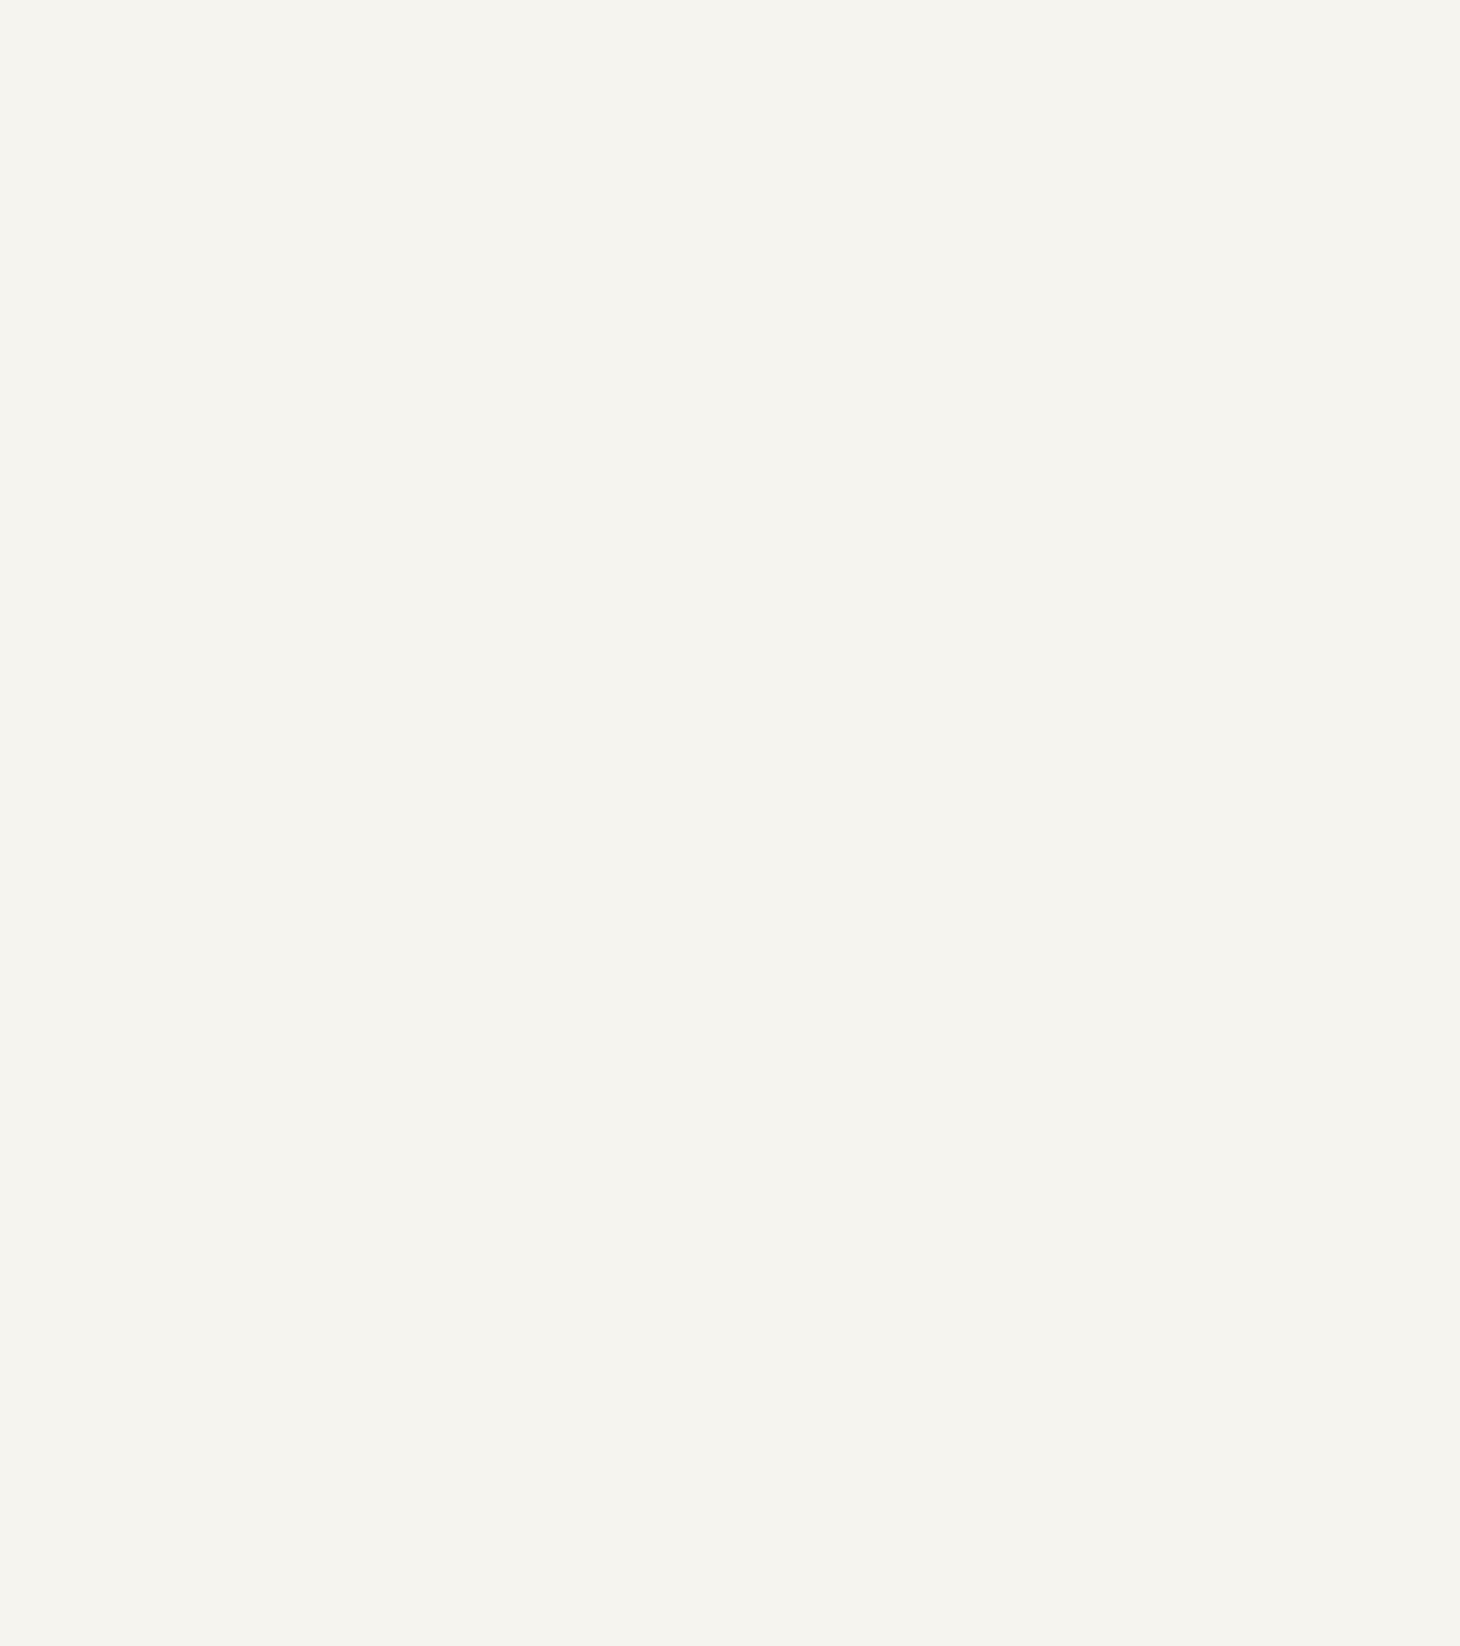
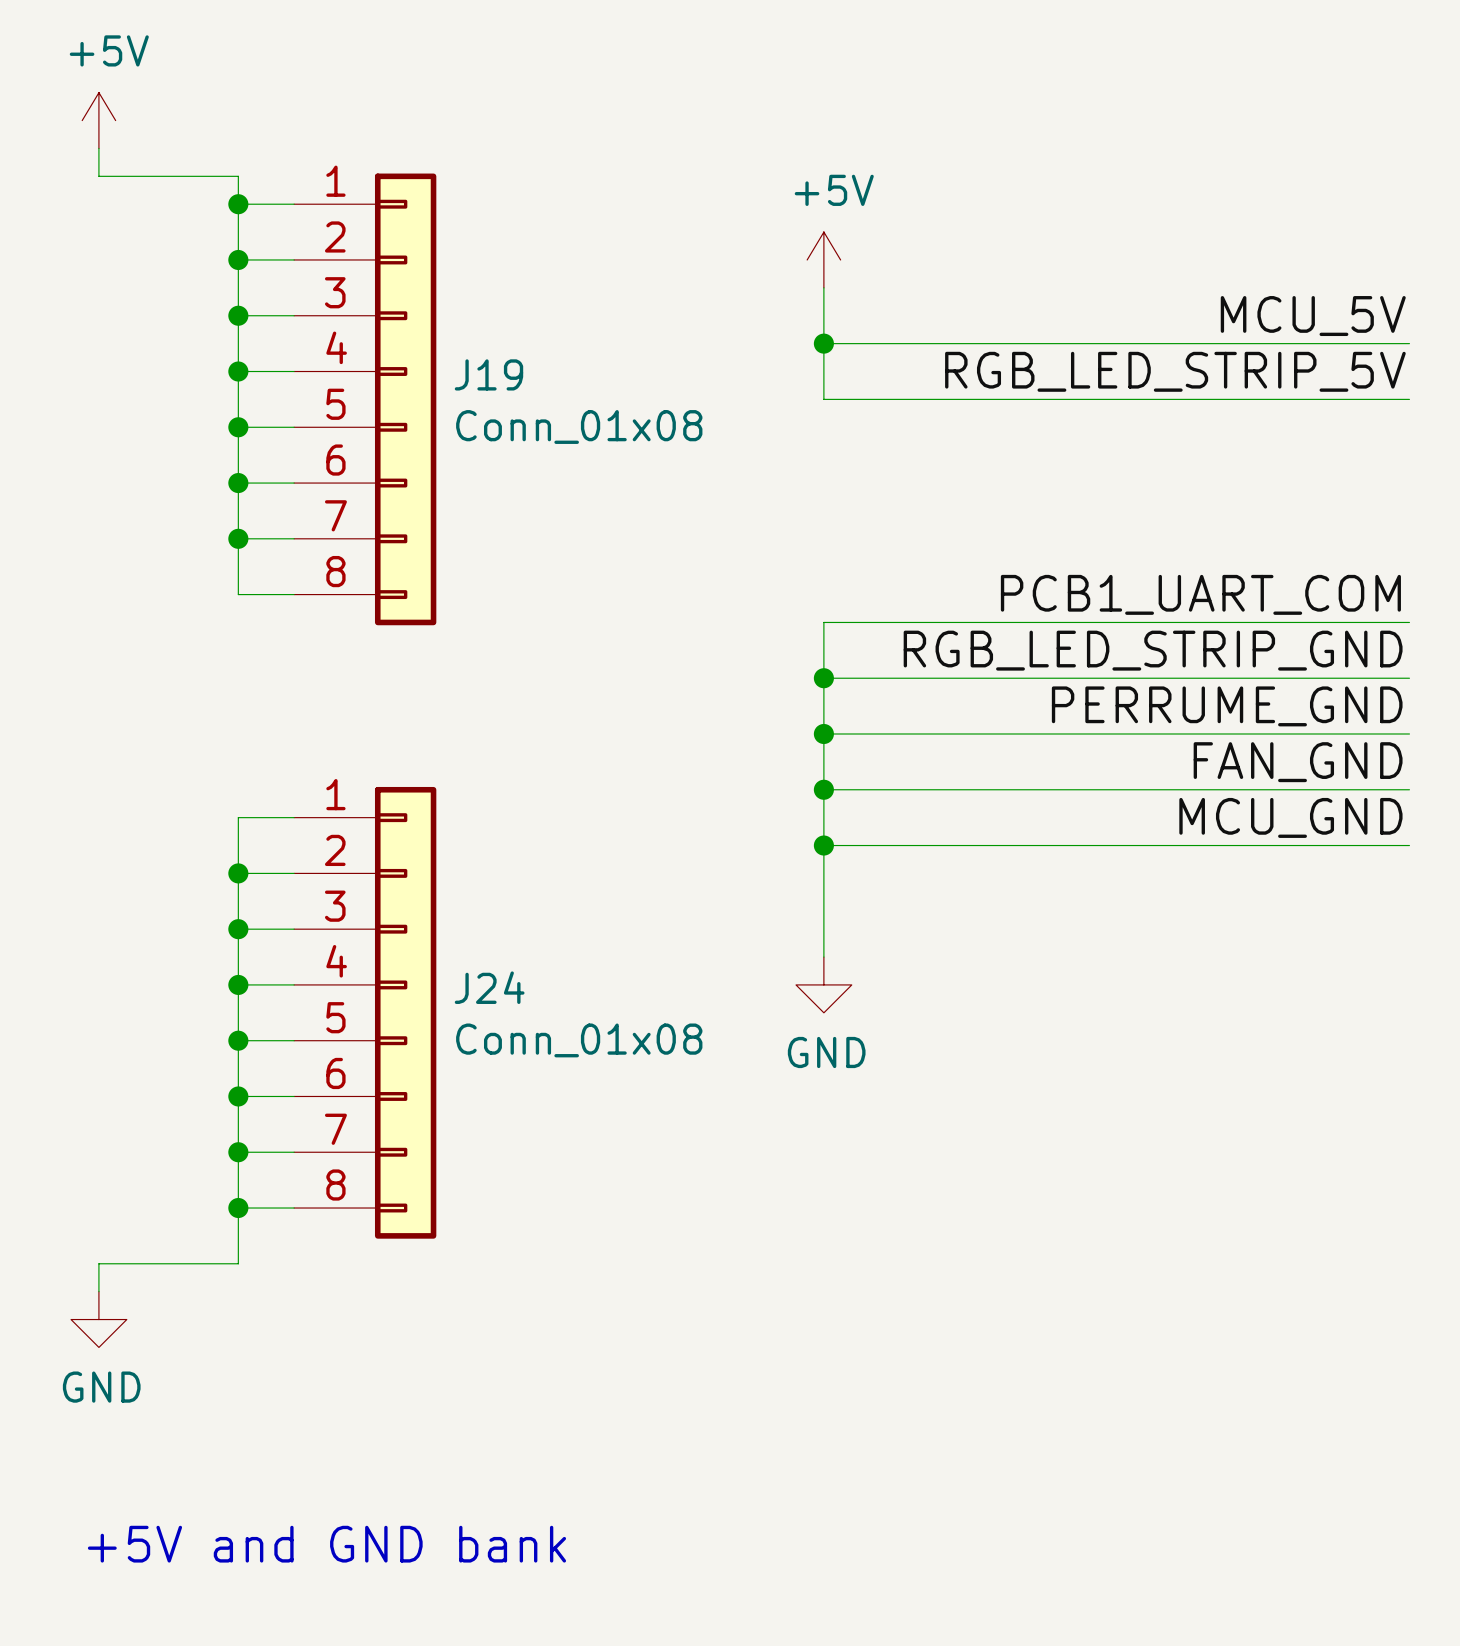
power symbol: none -> +5V (98, 120)
wire: none -> (98, 148) (98, 176) (238, 176) (238, 594) (294, 594)
wire: none -> (238, 204) (294, 204)
junction: none -> (238, 204)
wire: none -> (238, 259) (294, 259)
junction: none -> (238, 259)
power symbol: none -> +5V (823, 259)
wire: none -> (823, 287) (823, 399) (1409, 399)
wire: none -> (238, 315) (294, 315)
junction: none -> (238, 315)
label: none -> MCU_5V (1313, 316)
wire: none -> (823, 343) (1409, 343)
junction: none -> (823, 343)
wire: none -> (238, 371) (294, 371)
junction: none -> (238, 371)
label: none -> RGB_LED_STRIP_5V (1175, 371)
J19: none -> Conn_01x08 (365, 399)
wire: none -> (238, 427) (294, 427)
junction: none -> (238, 427)
wire: none -> (238, 483) (294, 483)
junction: none -> (238, 483)
wire: none -> (238, 538) (294, 538)
junction: none -> (238, 538)
label: none -> PCB1_UART_COM (1200, 594)
wire: none -> (1409, 622) (823, 622) (823, 957)
label: none -> RGB_LED_STRIP_GND (1153, 650)
wire: none -> (823, 678) (1409, 678)
junction: none -> (823, 678)
label: none -> PERRUME_GND (1227, 706)
wire: none -> (823, 733) (1409, 733)
junction: none -> (823, 733)
label: none -> FAN_GND (1298, 762)
wire: none -> (823, 789) (1409, 789)
junction: none -> (823, 789)
wire: none -> (294, 817) (238, 817) (238, 1263) (98, 1263) (98, 1291)
label: none -> MCU_GND (1290, 817)
wire: none -> (823, 845) (1409, 845)
junction: none -> (823, 845)
wire: none -> (238, 873) (294, 873)
junction: none -> (238, 873)
wire: none -> (238, 929) (294, 929)
junction: none -> (238, 929)
wire: none -> (238, 984) (294, 984)
junction: none -> (238, 984)
power symbol: none -> GND (823, 984)
J24: none -> Conn_01x08 (365, 1012)
wire: none -> (238, 1040) (294, 1040)
junction: none -> (238, 1040)
wire: none -> (238, 1096) (294, 1096)
junction: none -> (238, 1096)
wire: none -> (238, 1152) (294, 1152)
junction: none -> (238, 1152)
wire: none -> (238, 1208) (294, 1208)
junction: none -> (238, 1208)
power symbol: none -> GND (98, 1319)
text: none -> +5V and GND bank (326, 1544)

